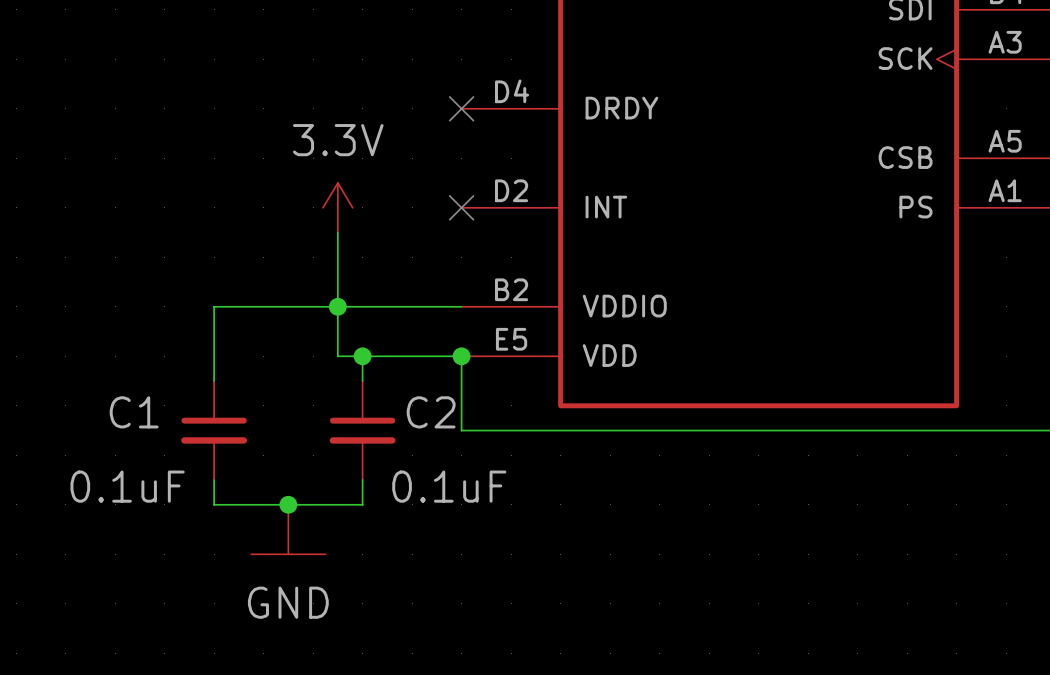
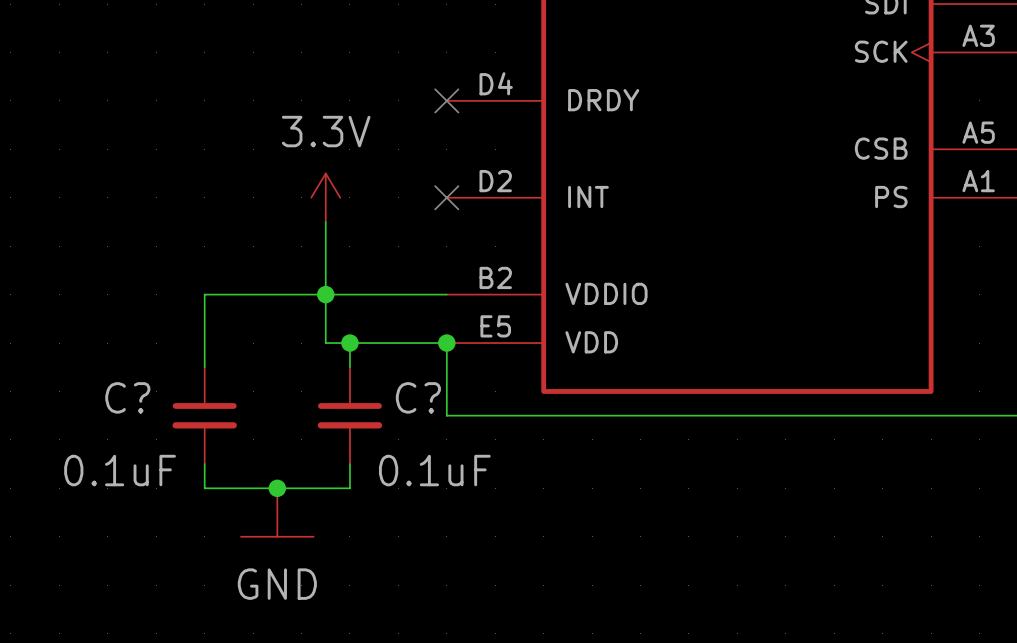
C1 name: C1 (134, 412) -> C? (127, 397)
C2 name: C2 (431, 412) -> C? (418, 397)

